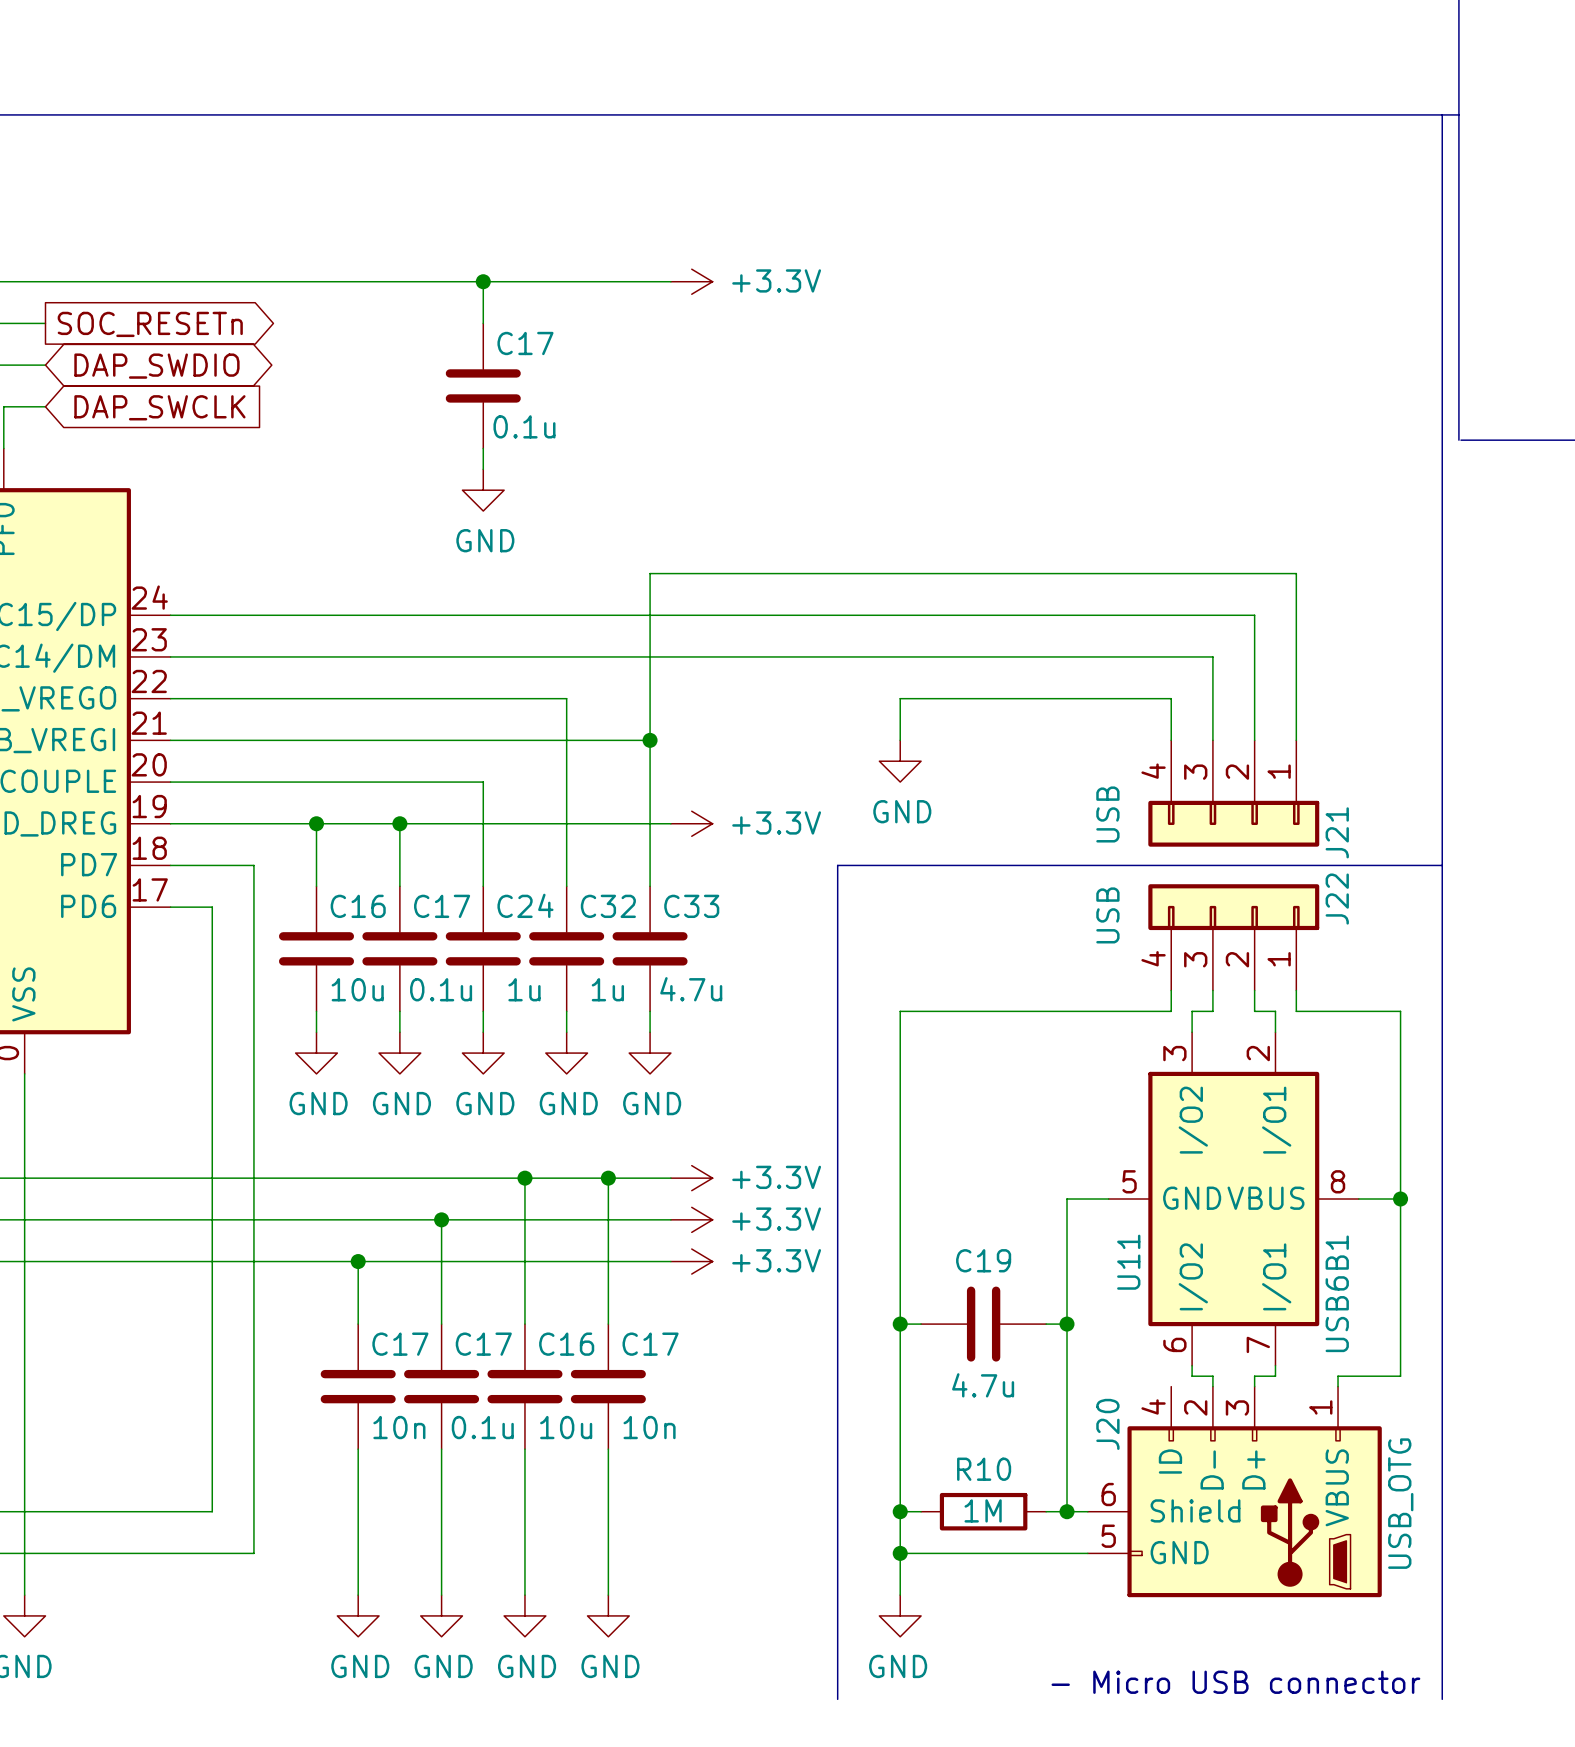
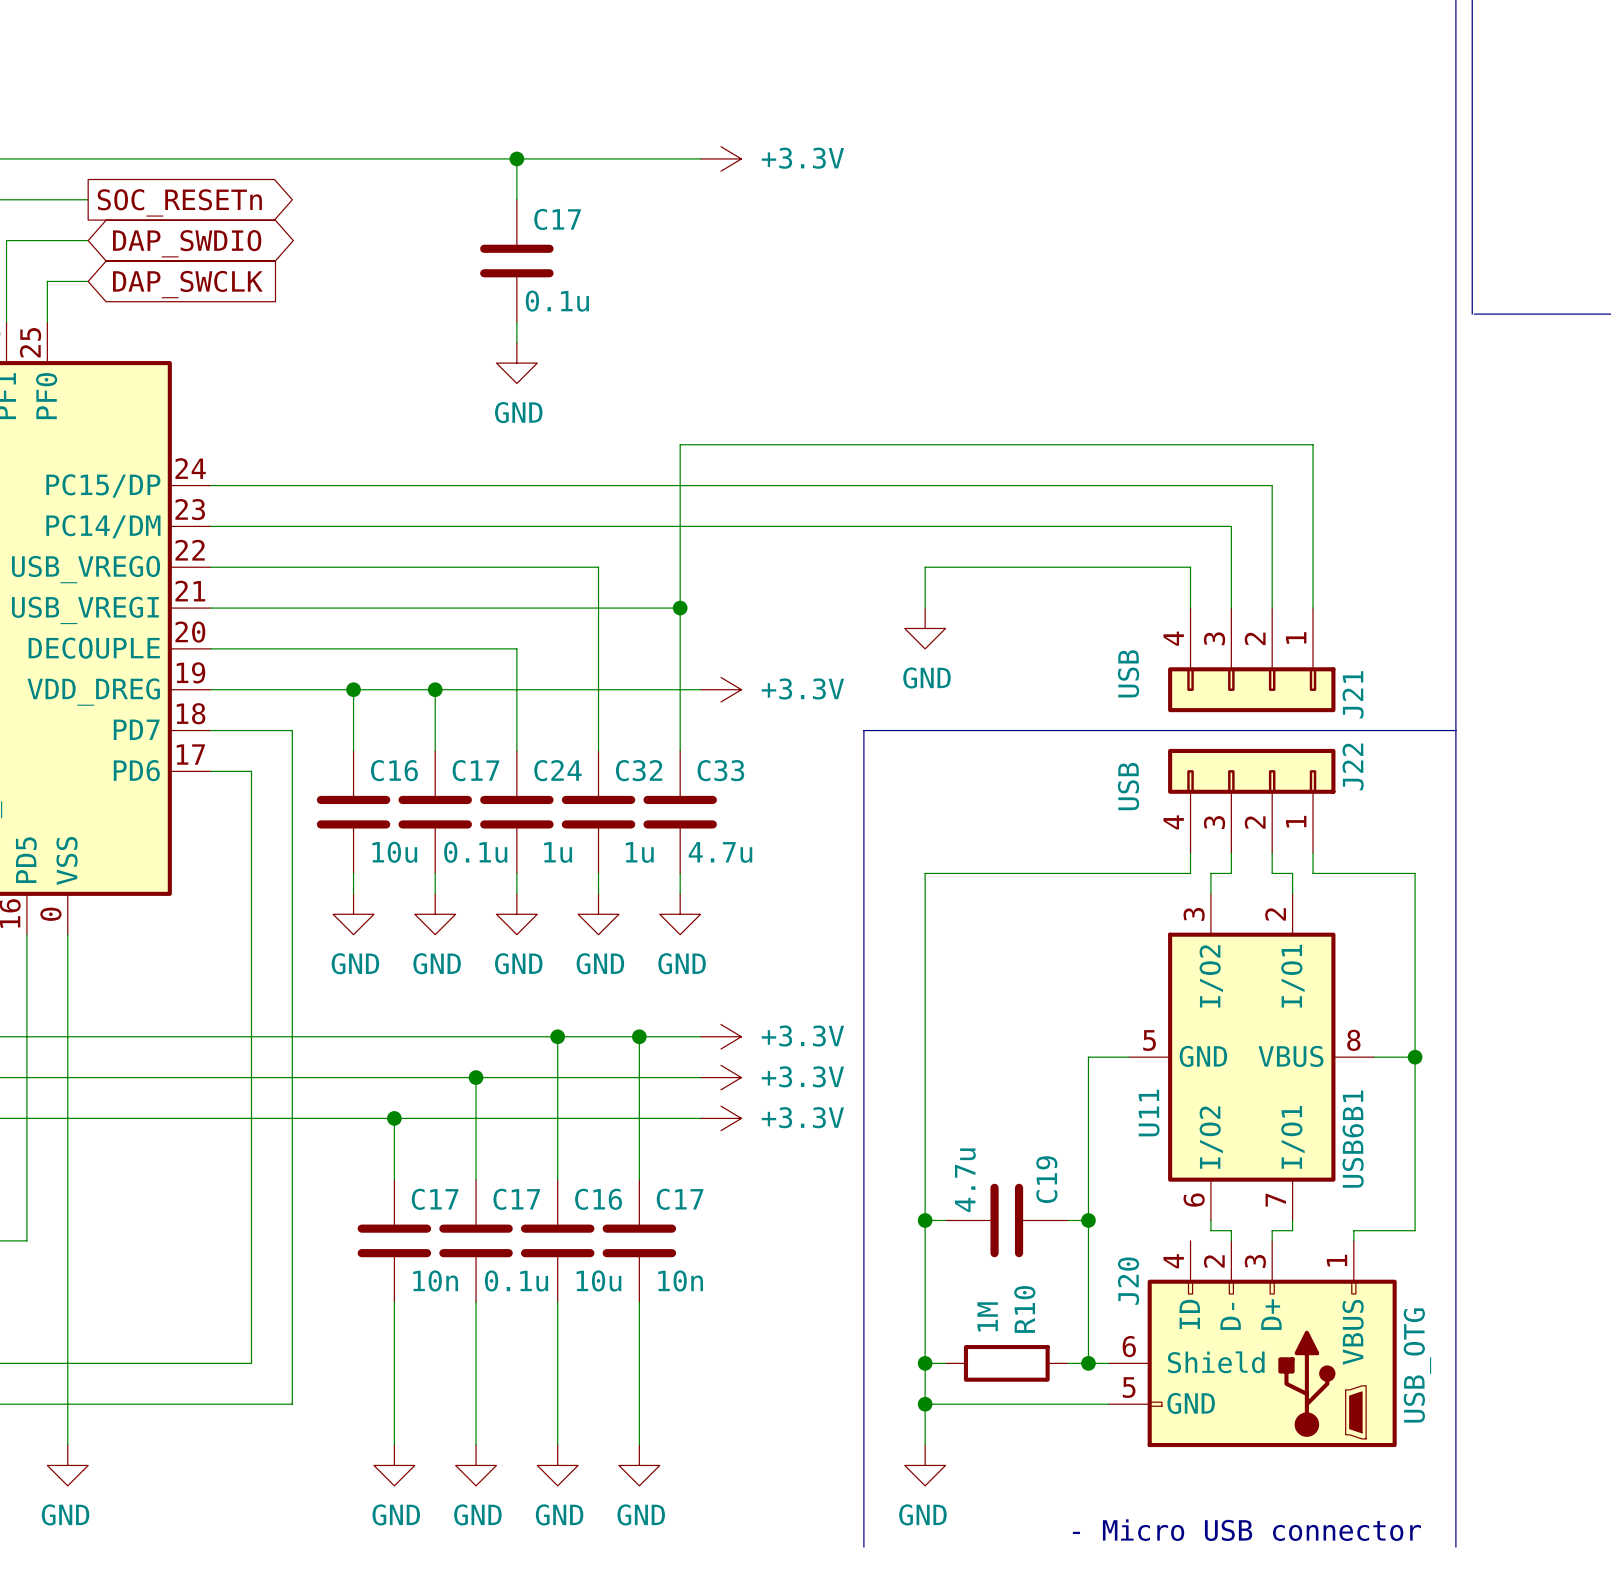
C19 name rotation: 0° (983, 1260) -> 90° counterclockwise (1046, 1179)
wire: (900, 1324) (921, 1324) -> (925, 1220) (945, 1220)
junction position: (900, 1324) -> (925, 1220)
C19 position: (983, 1324) -> (1006, 1220)
wire: (1046, 1324) (1067, 1324) -> (1068, 1220) (1088, 1220)
junction position: (1067, 1324) -> (1088, 1220)
C19 value rotation: 0° (983, 1385) -> 90° counterclockwise (965, 1180)
R10 name rotation: 0° (984, 1469) -> 90° counterclockwise (1024, 1309)
R10 value rotation: 0° (983, 1510) -> 90° counterclockwise (987, 1316)
R10 value position: 1M (983, 1510) -> 1M (987, 1316)

